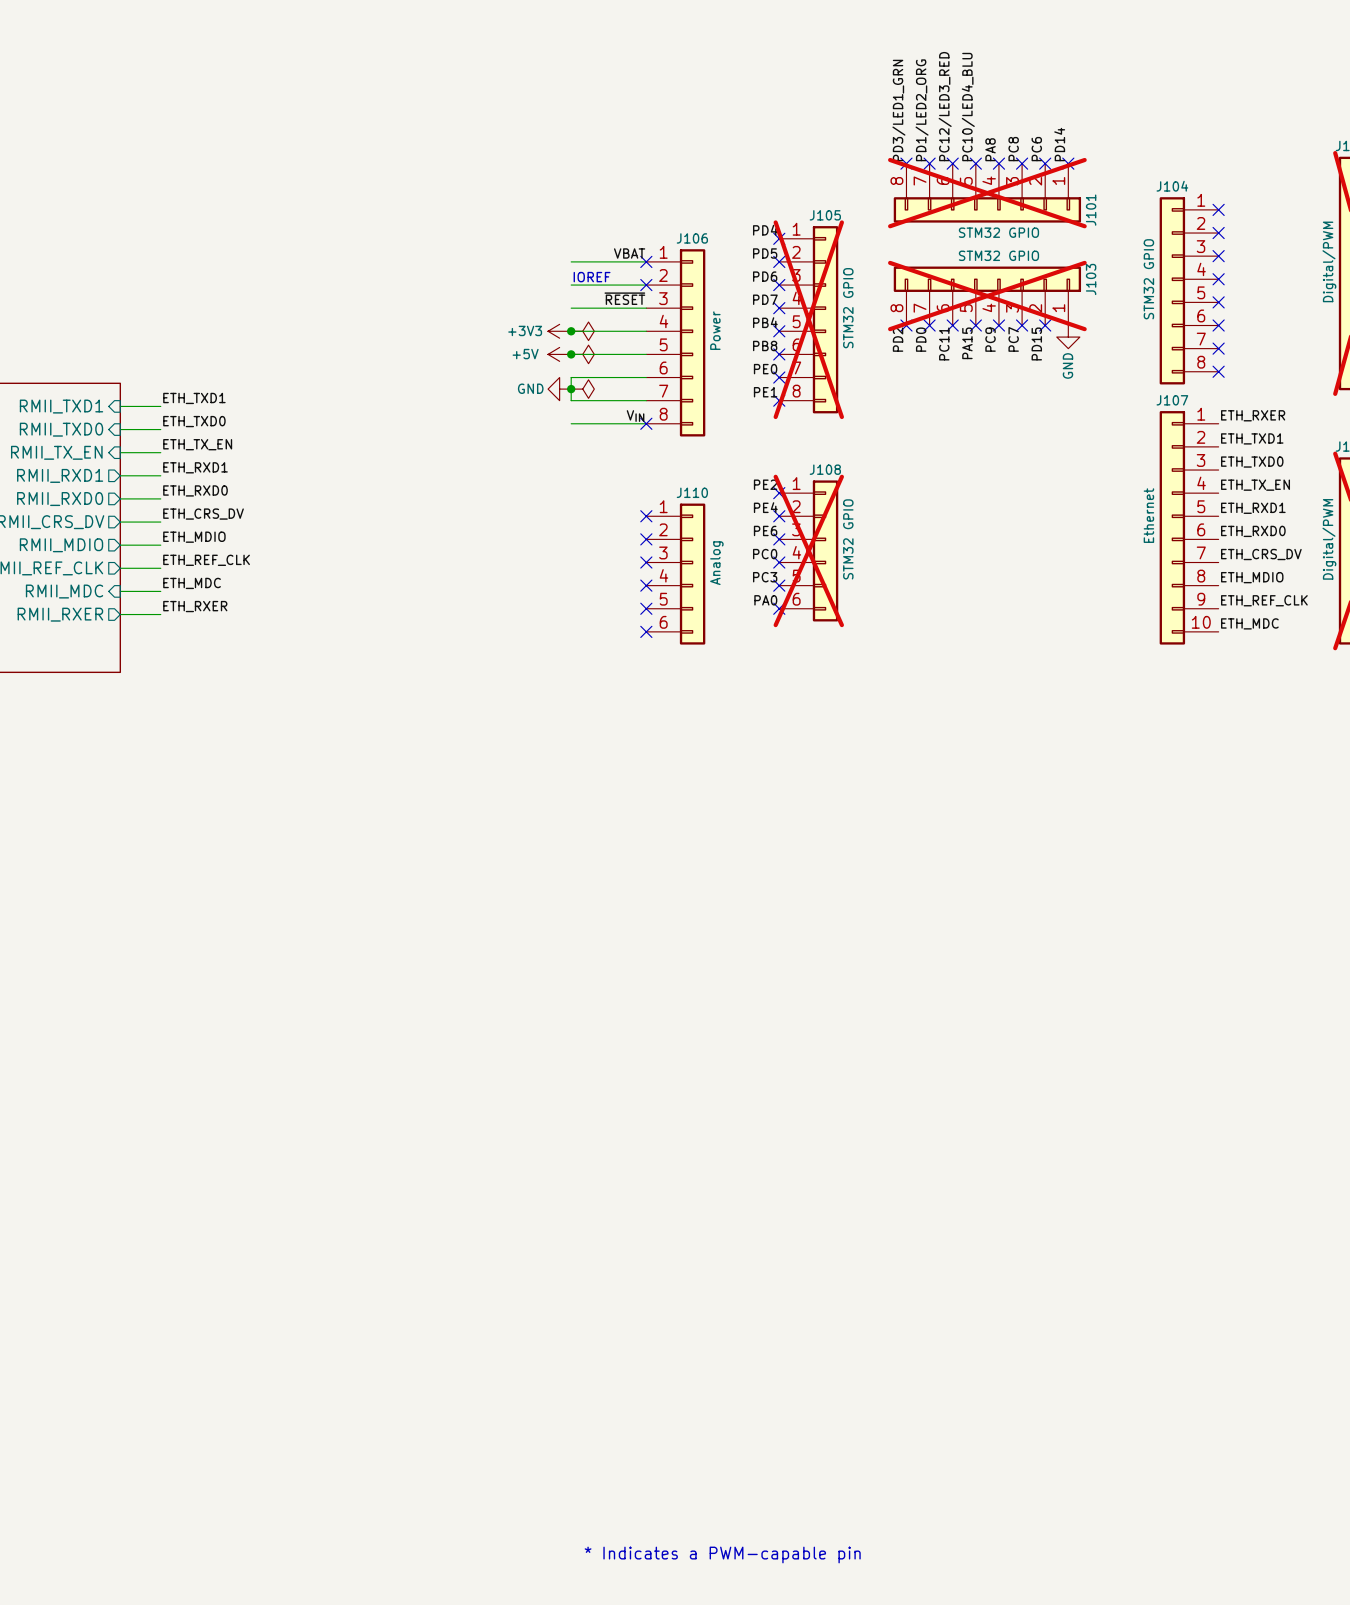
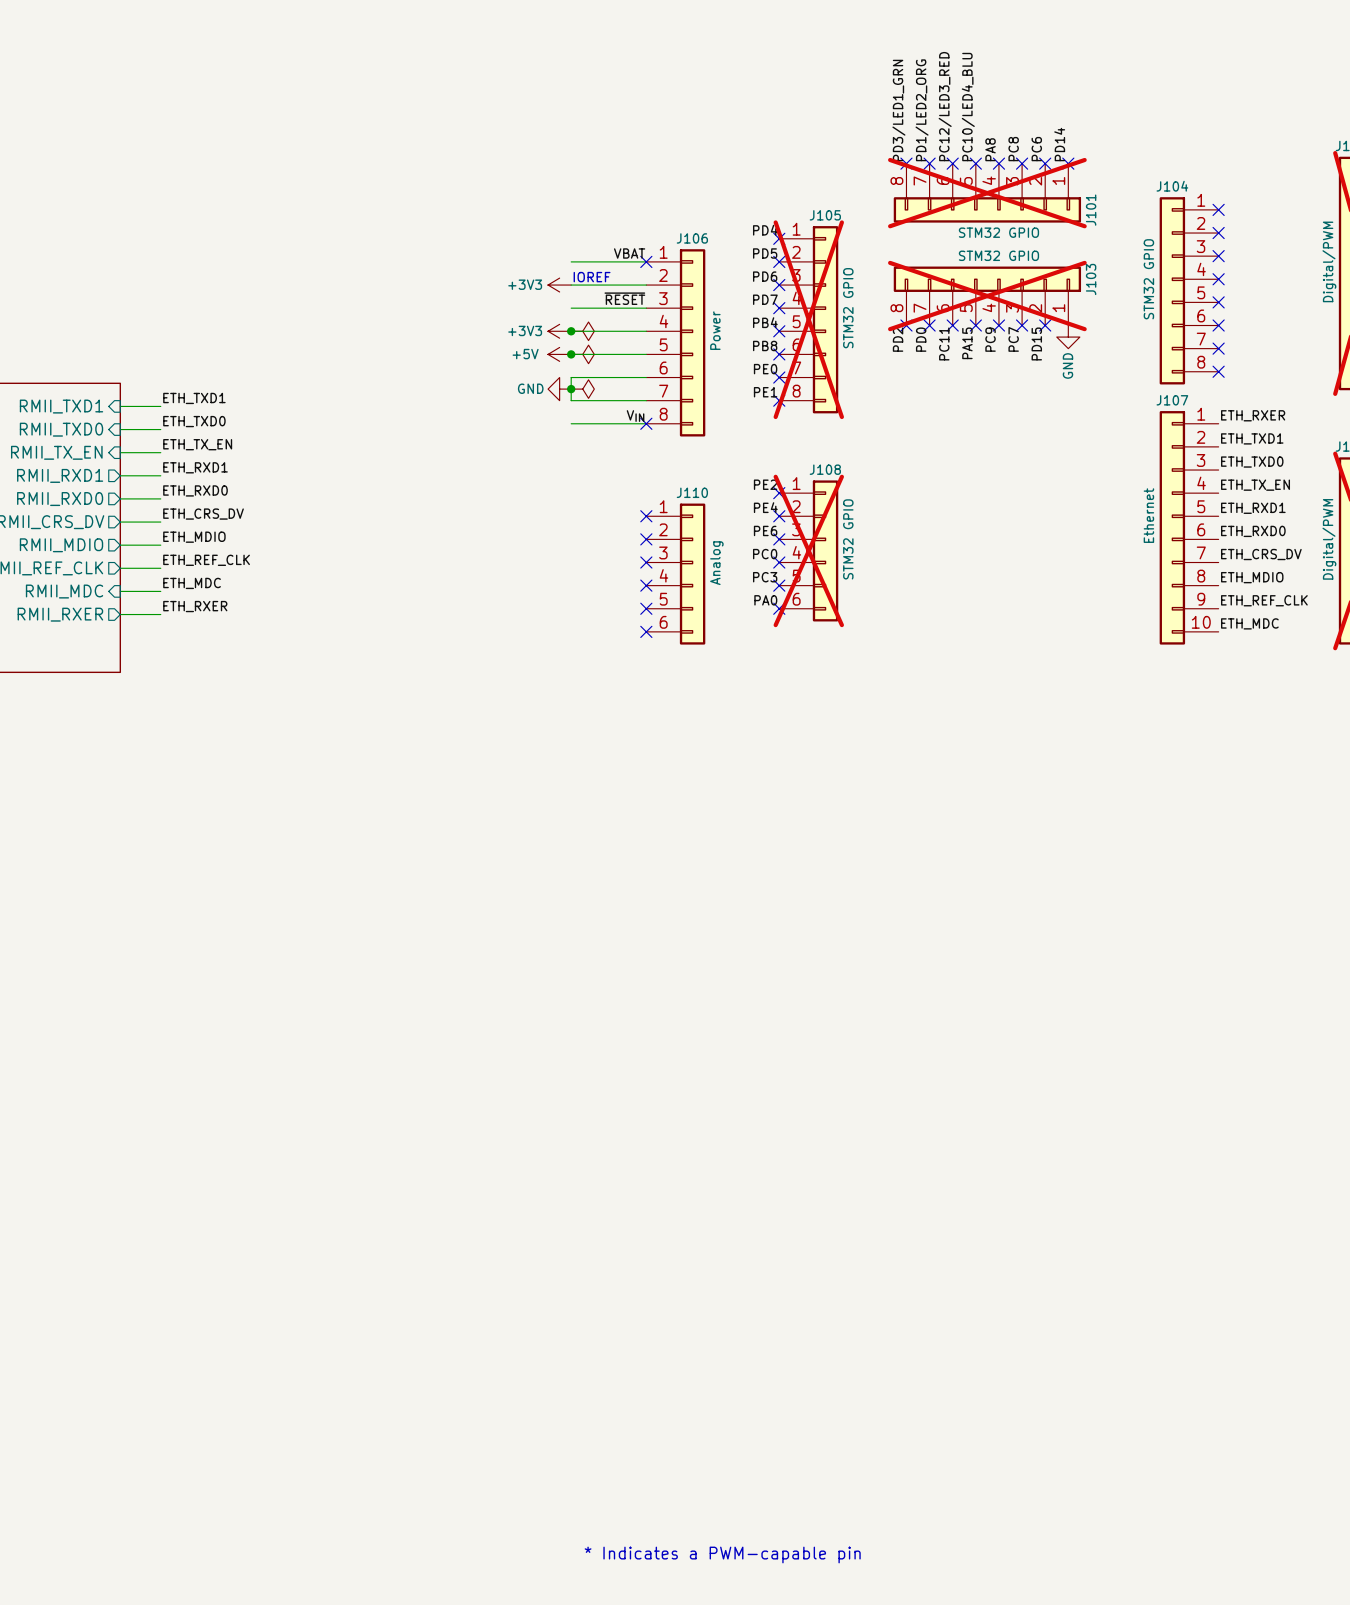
power symbol: none -> +3V3 (559, 285)
no-connect mark: (646, 285) -> none

